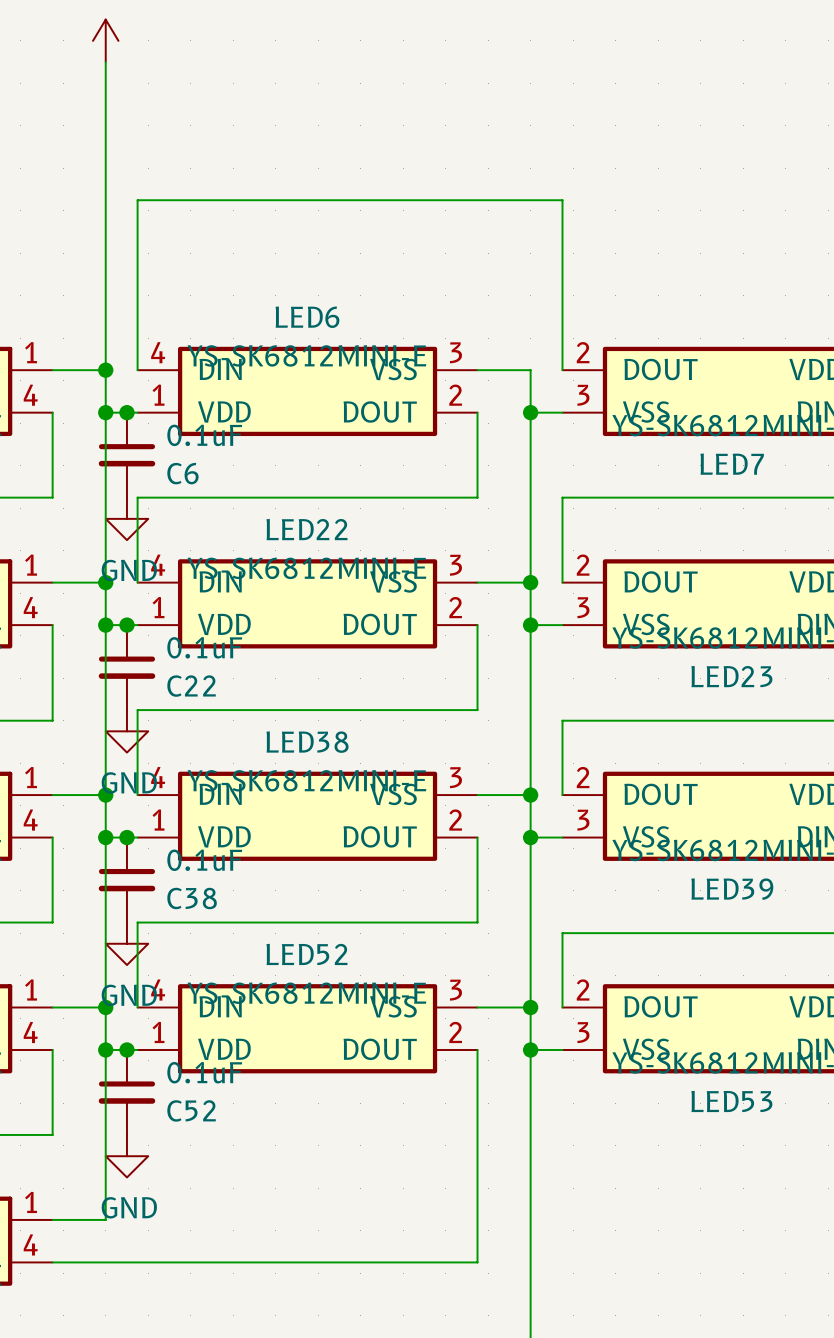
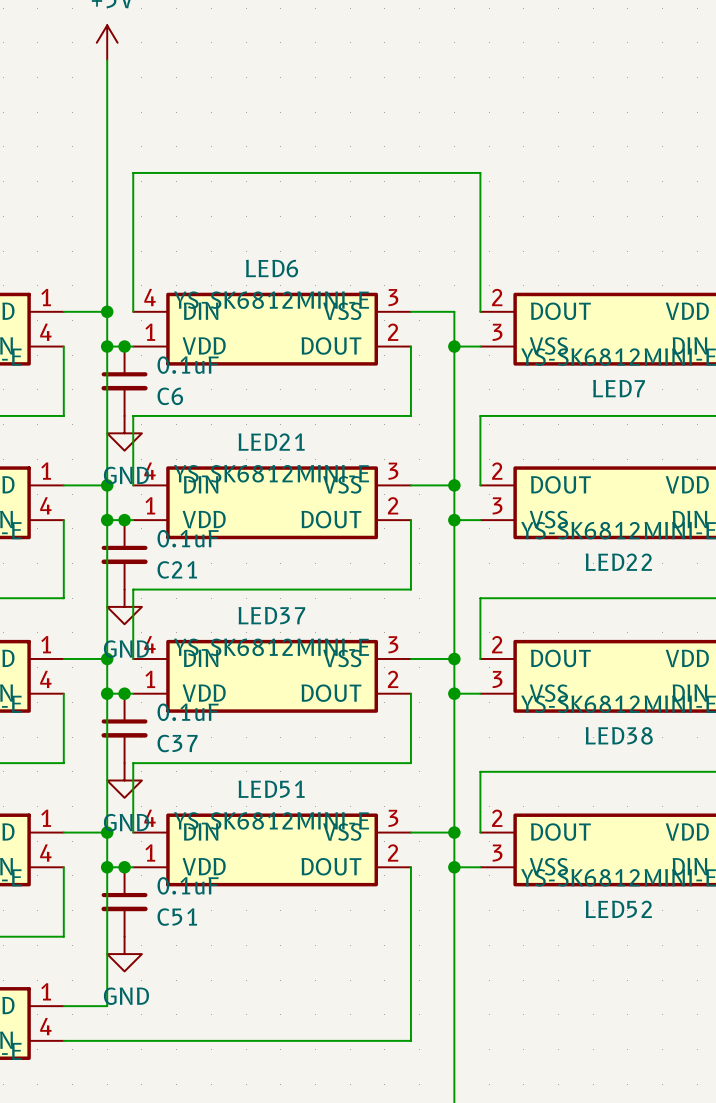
LED22 name: LED22 (306, 529) -> LED21 (271, 442)
LED23 name: LED23 (731, 676) -> LED22 (618, 562)
C22 name: C22 (191, 686) -> C21 (177, 569)
LED38 name: LED38 (307, 742) -> LED37 (271, 615)
LED39 name: LED39 (732, 889) -> LED38 (619, 735)
C38 name: C38 (192, 898) -> C37 (177, 743)
LED52 name: LED52 (306, 954) -> LED51 (271, 789)
LED53 name: LED53 (731, 1101) -> LED52 (618, 909)
C52 name: C52 (191, 1110) -> C51 (177, 917)

